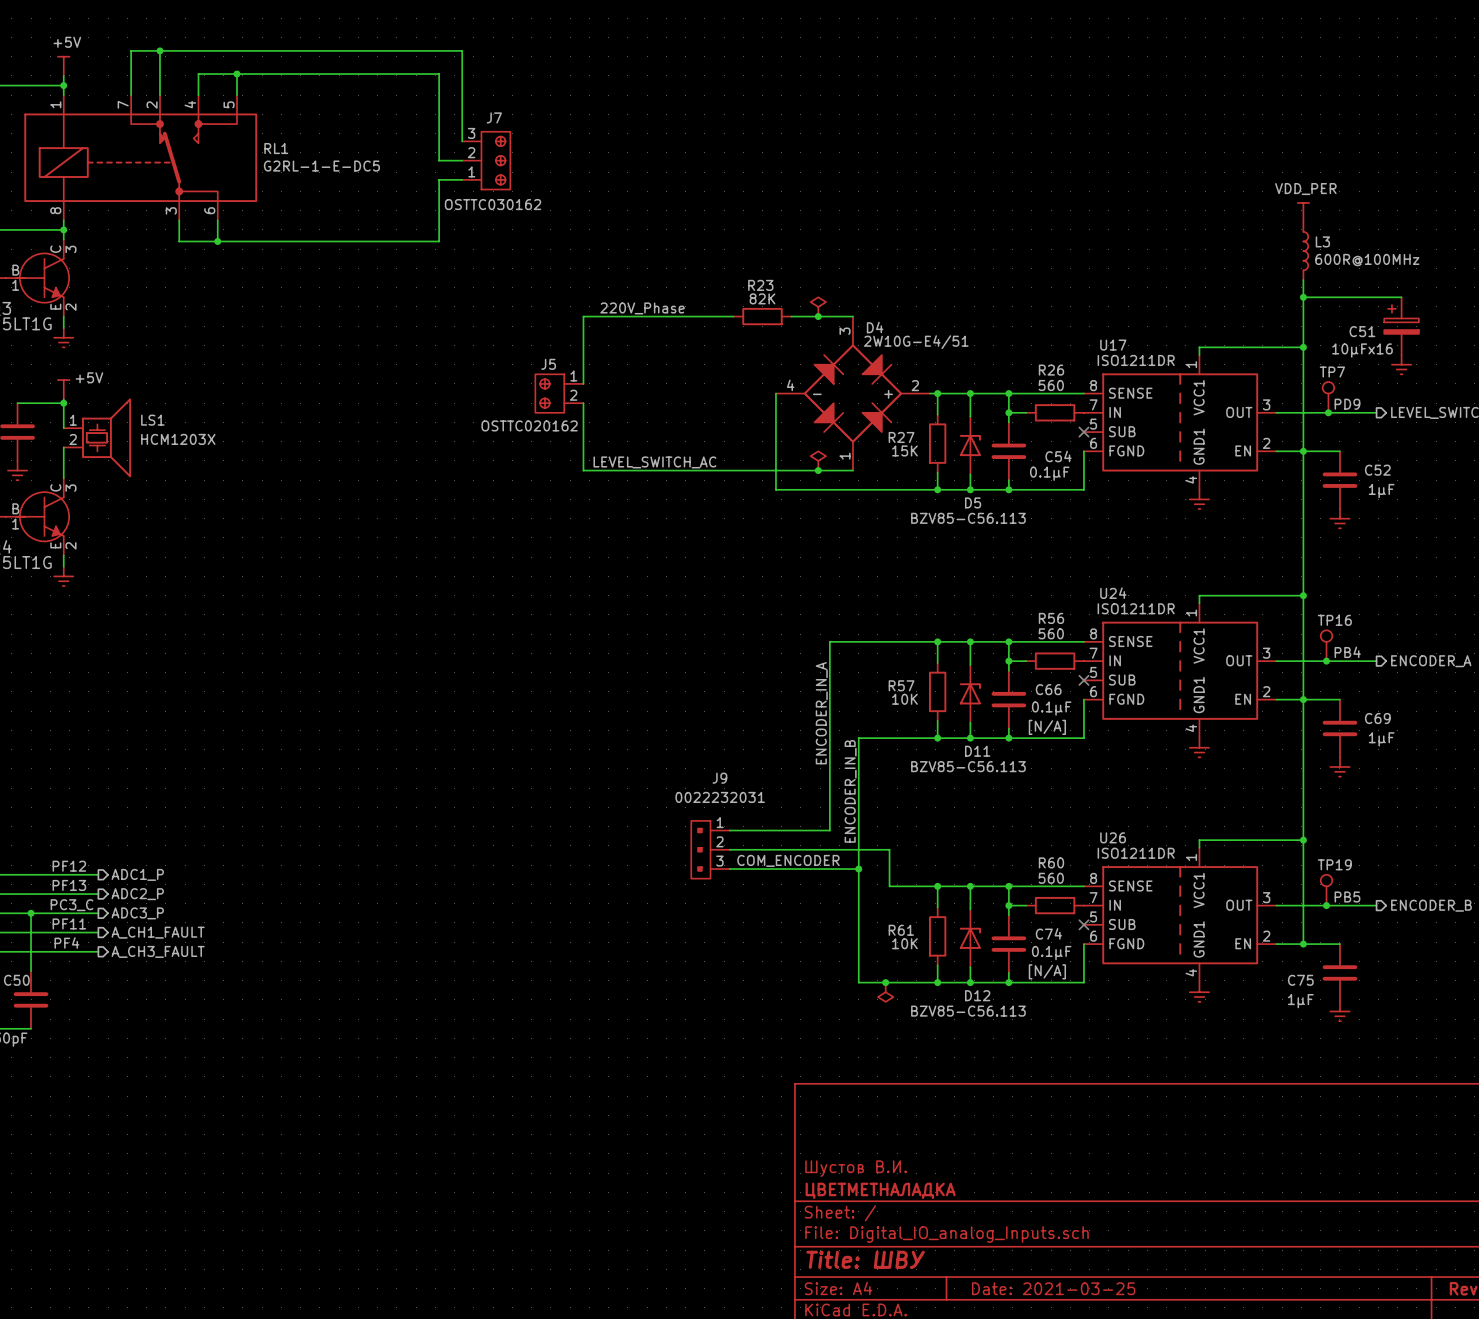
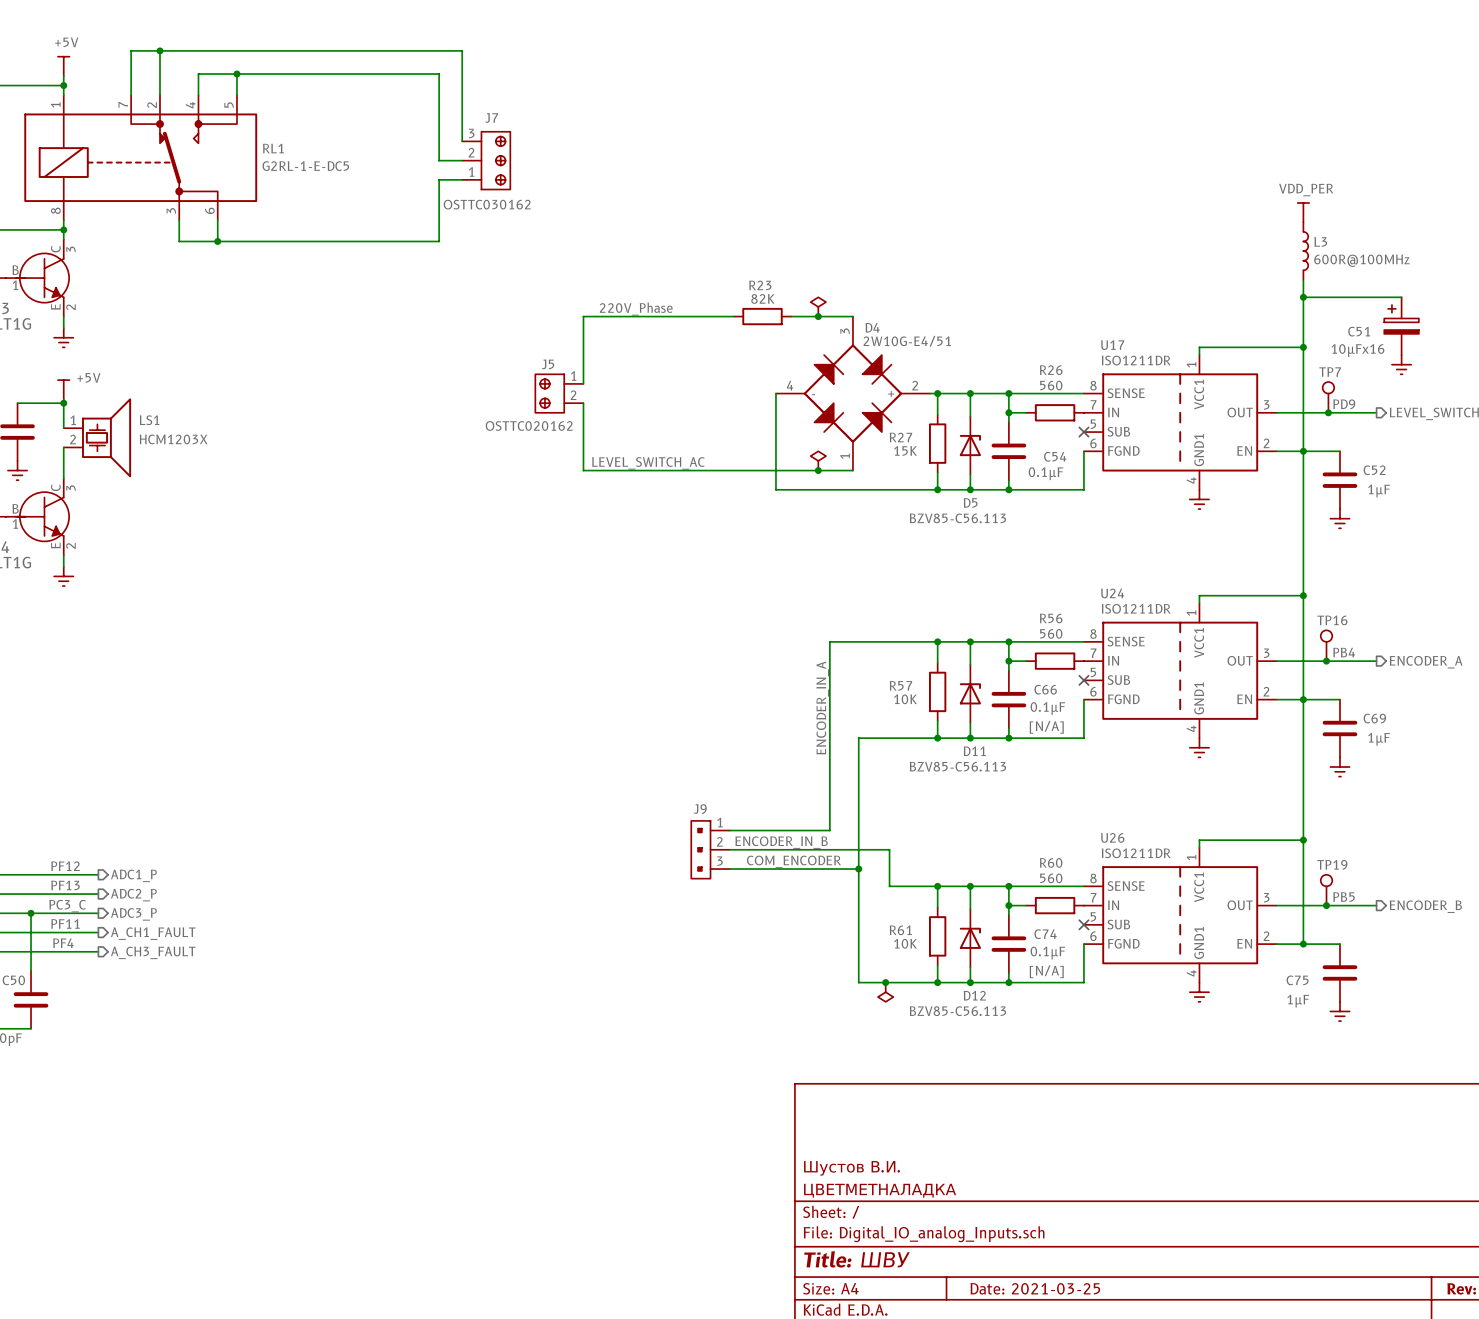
J9 name position: J9 (719, 778) -> J9 (700, 809)
label rotation: 0° (850, 791) -> 90° clockwise (781, 842)
J9 value: 0022232031 (720, 797) -> none

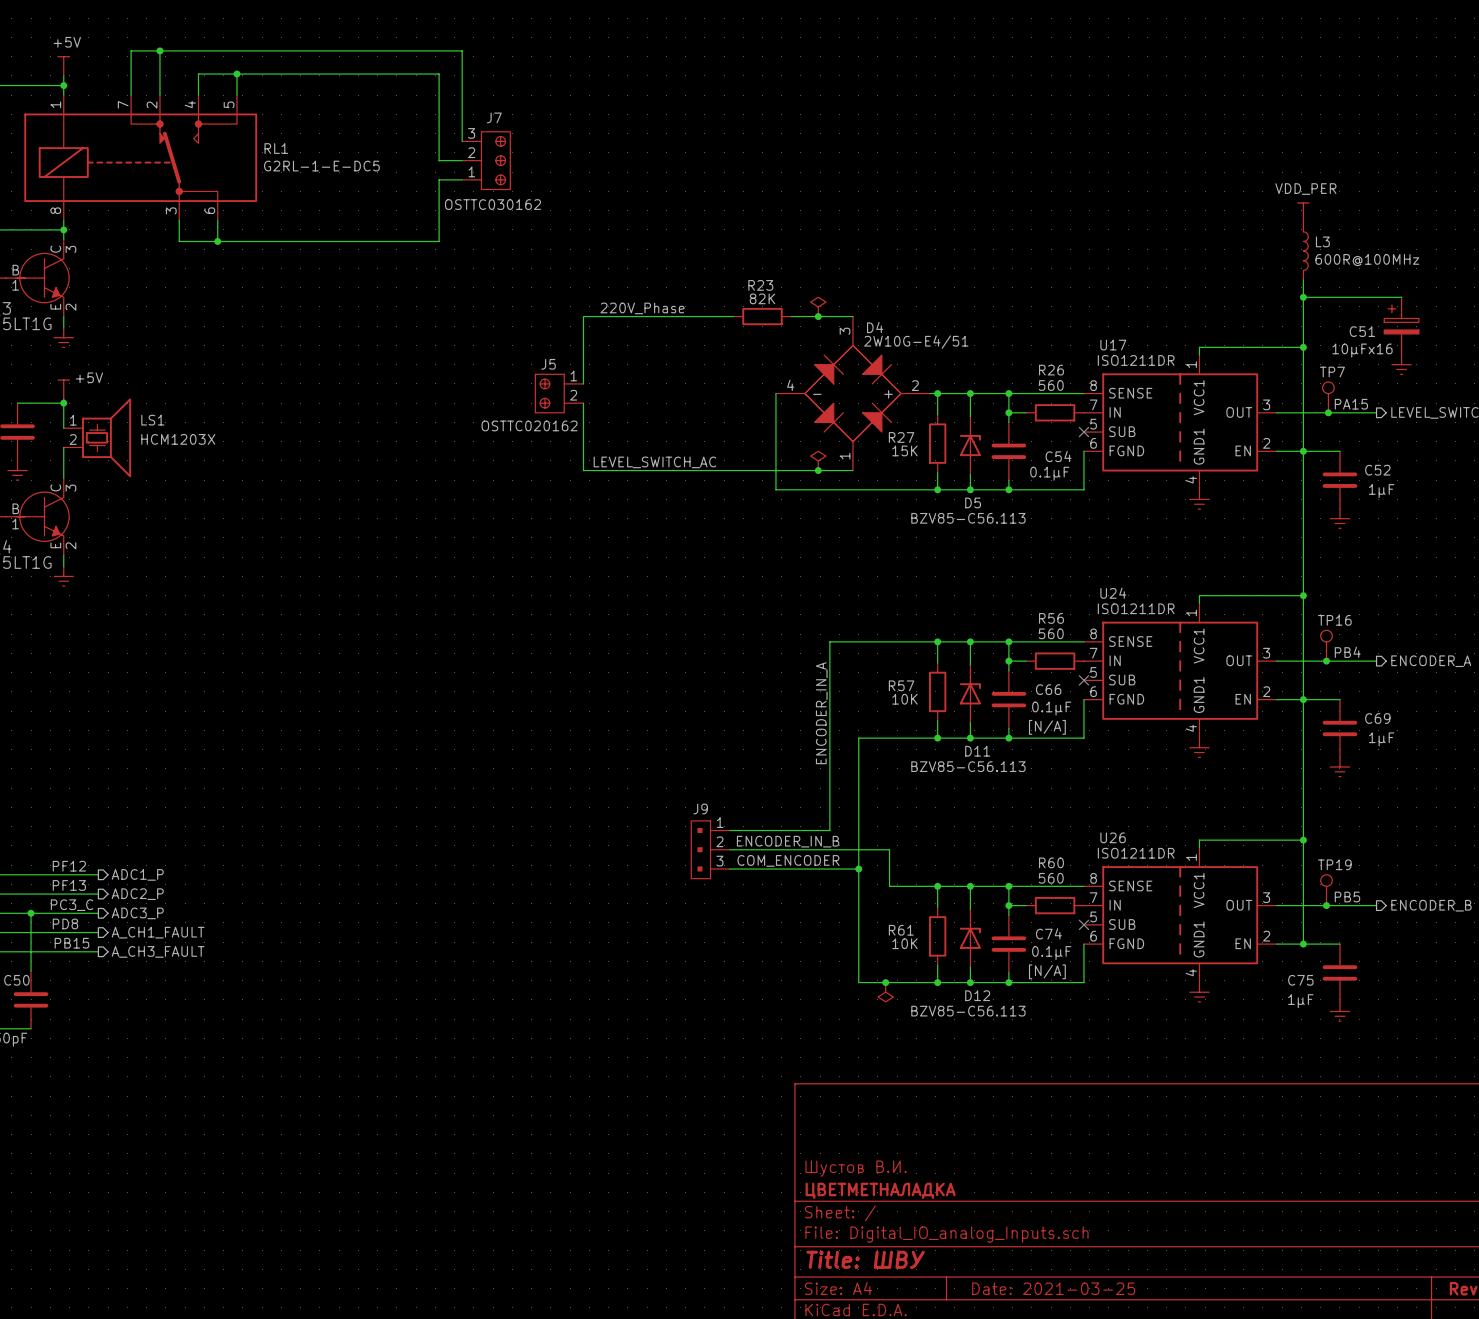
label: PD9 (1344, 404) -> PA15 (1351, 404)
label: PF11 (65, 923) -> PD8 (65, 923)
label: PF4 (63, 943) -> PB15 (71, 943)

